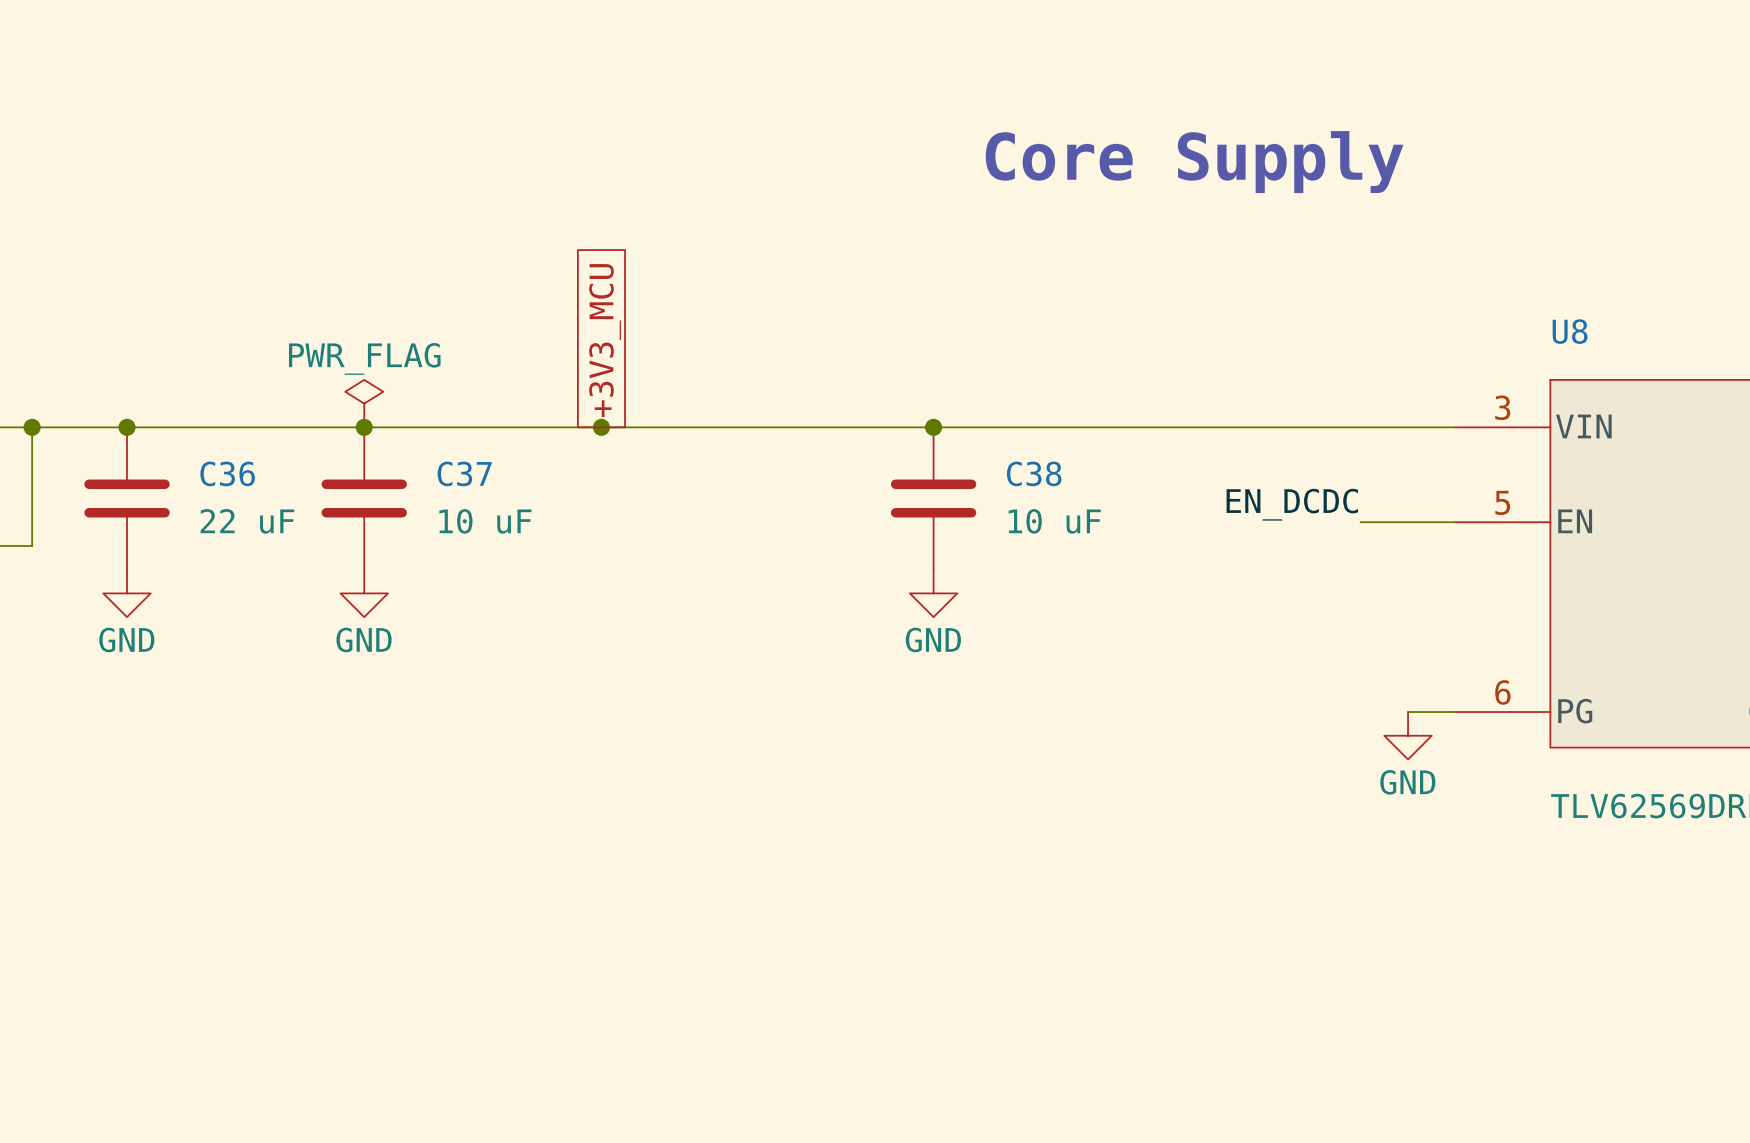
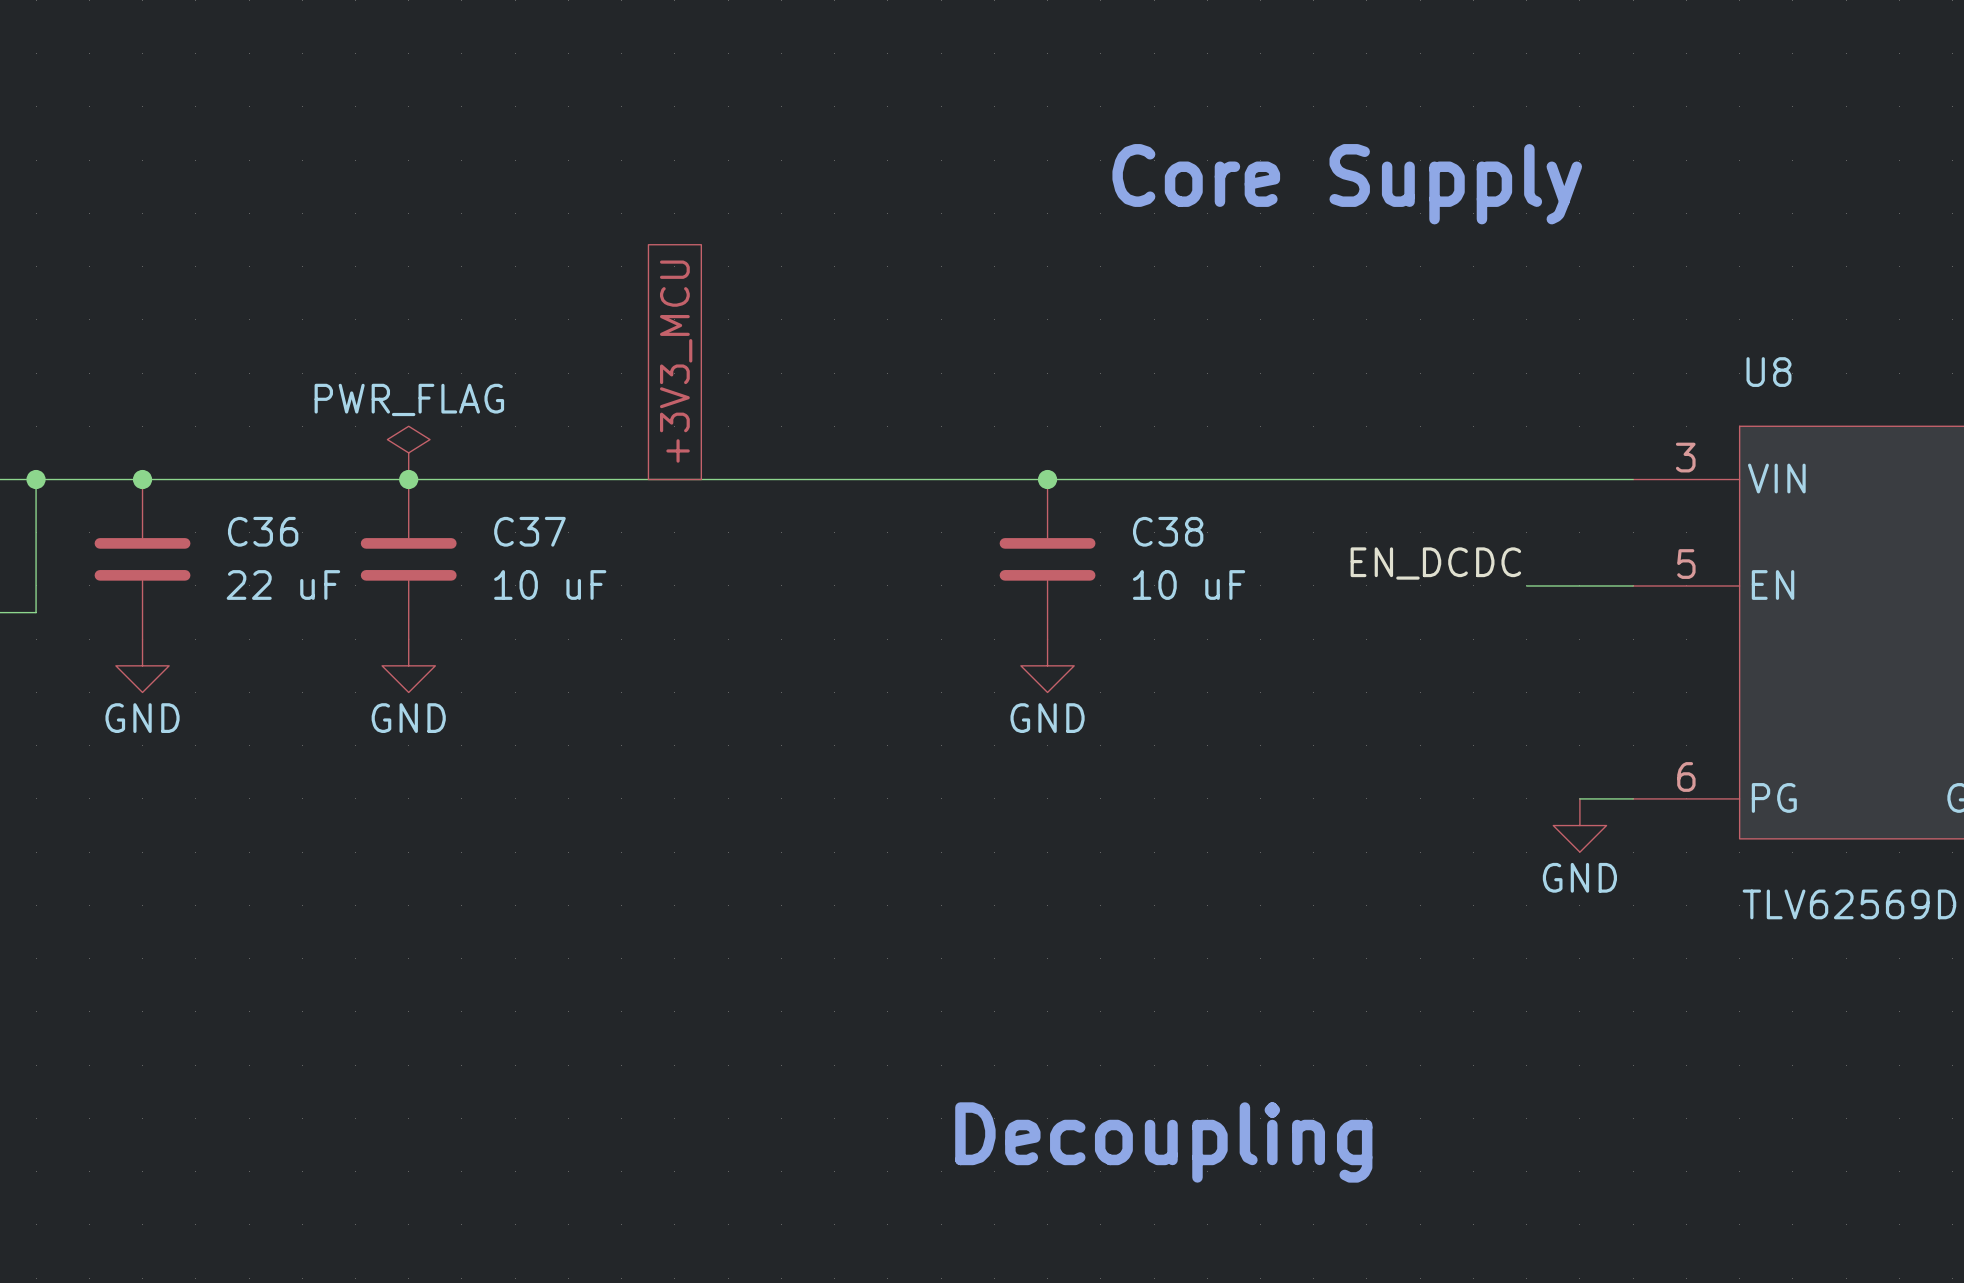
junction: (601, 427) -> none
text: none -> Decoupling (1163, 1142)

